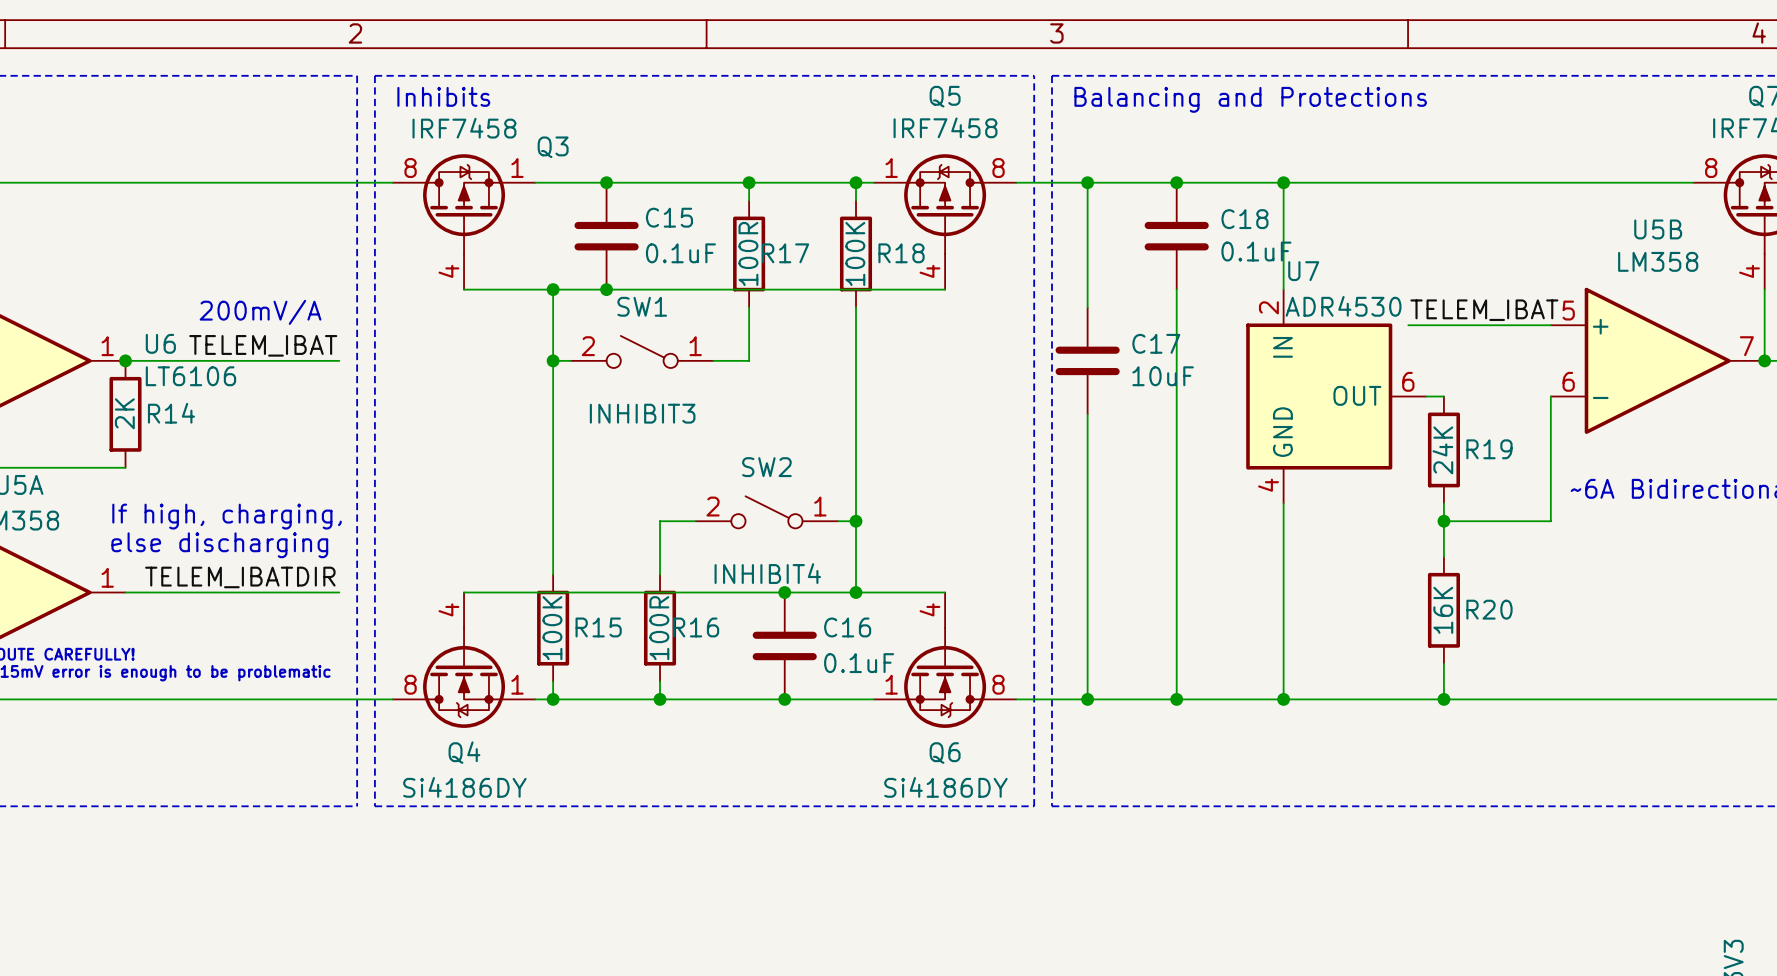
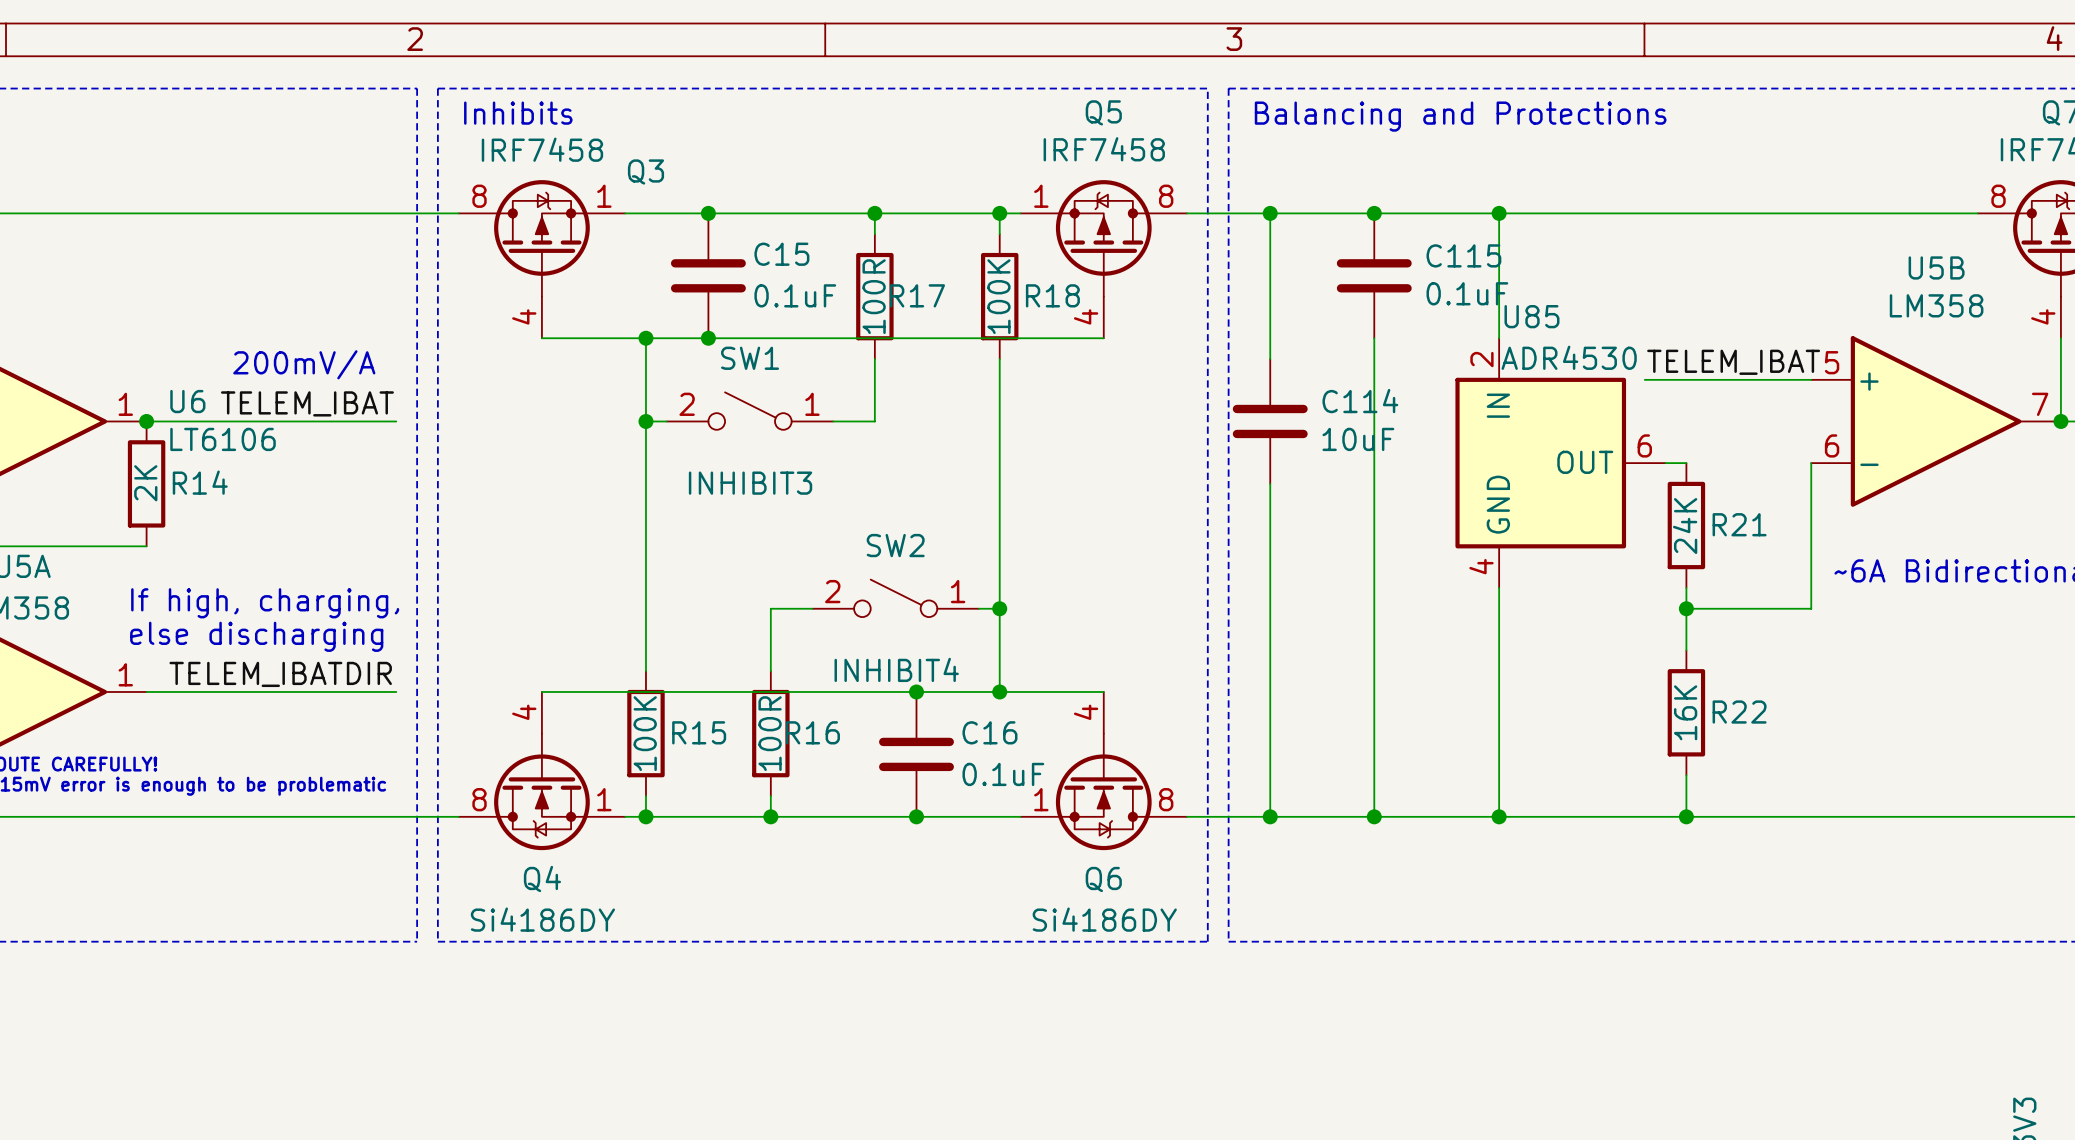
C18 name: C18 (1244, 219) -> C115 (1463, 255)
U7 name: U7 (1303, 271) -> U85 (1531, 316)
C17 name: C17 (1156, 343) -> C114 (1360, 401)
R19 name: R19 (1489, 449) -> R21 (1739, 524)
R20 name: R20 (1489, 609) -> R22 (1739, 712)

